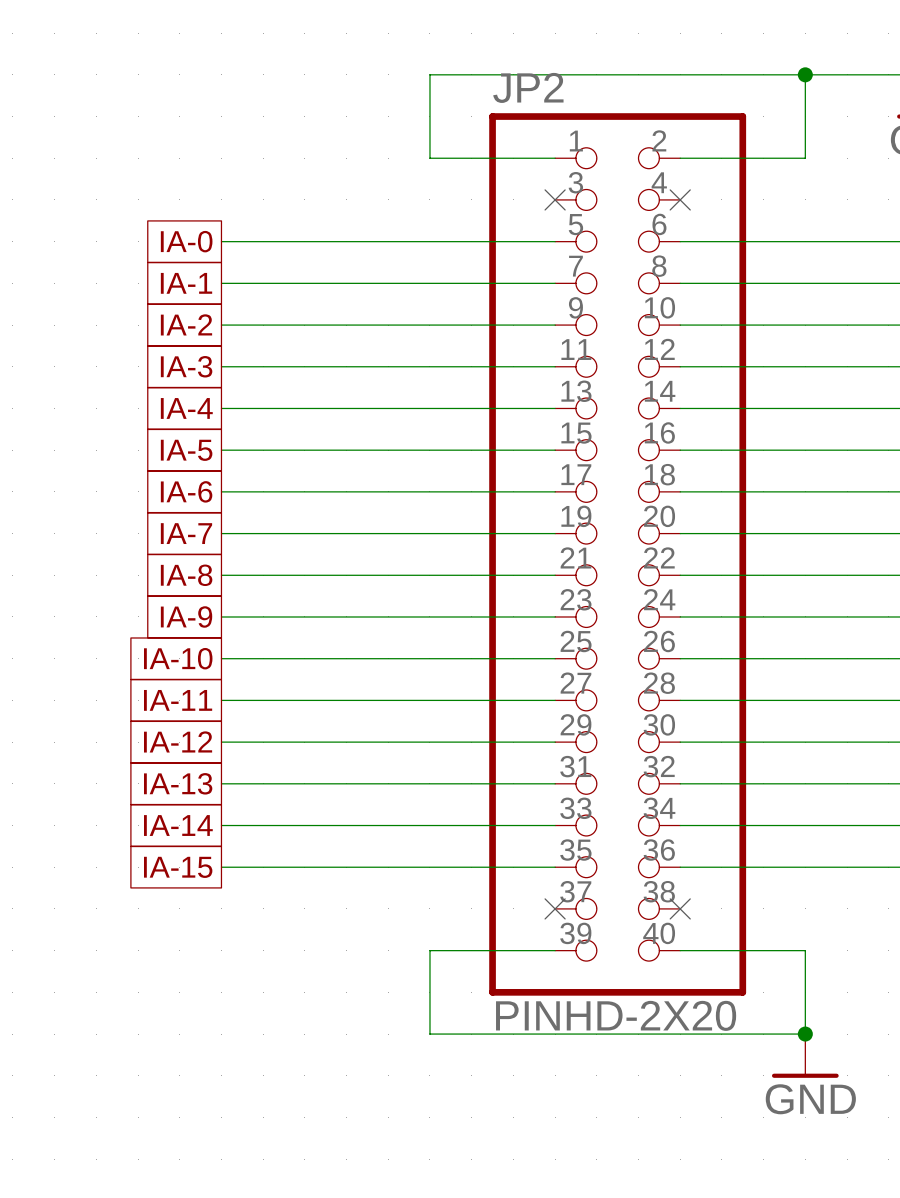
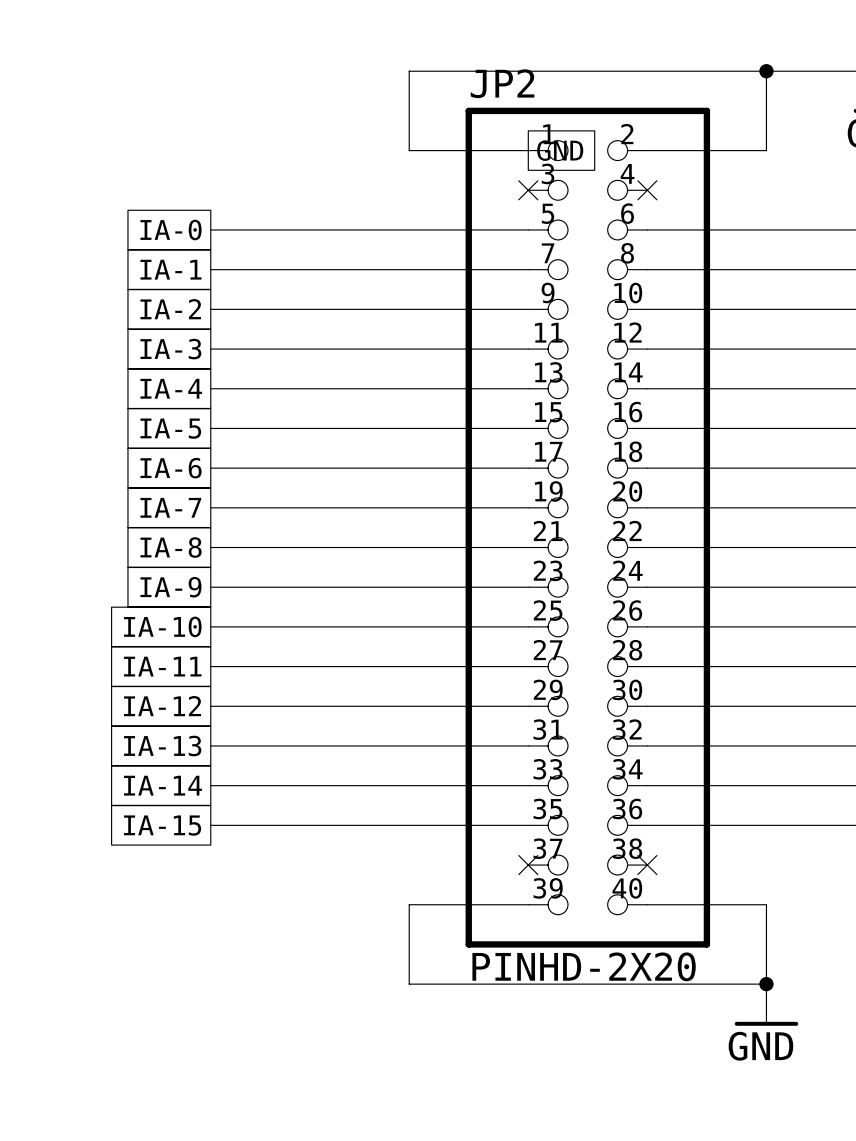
global label: none -> GND (560, 150)

